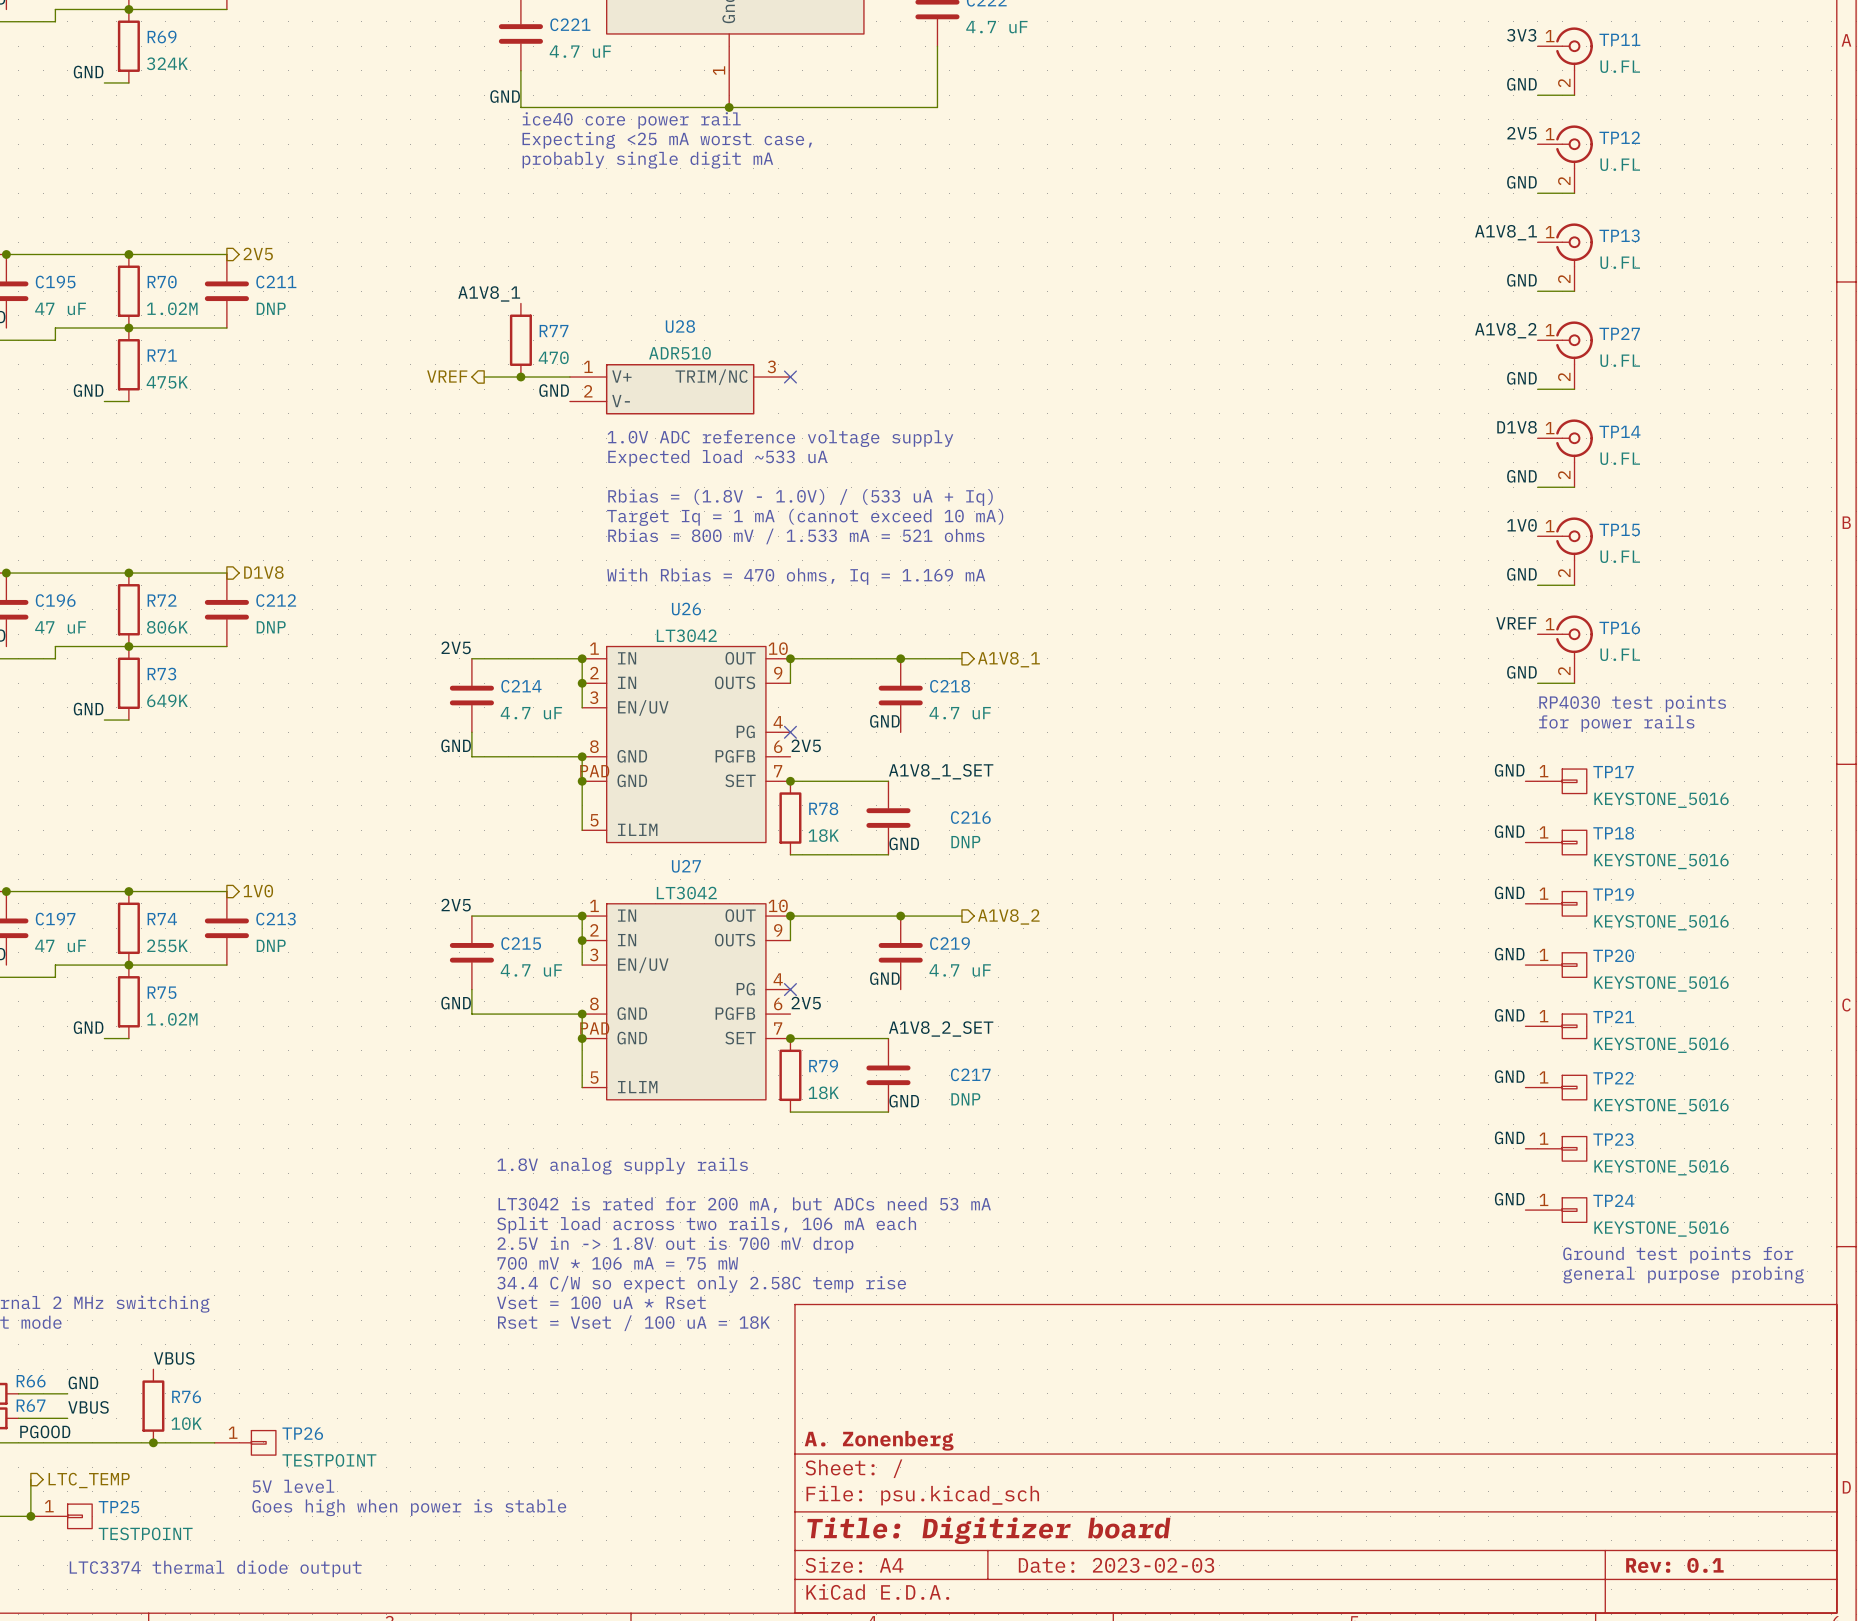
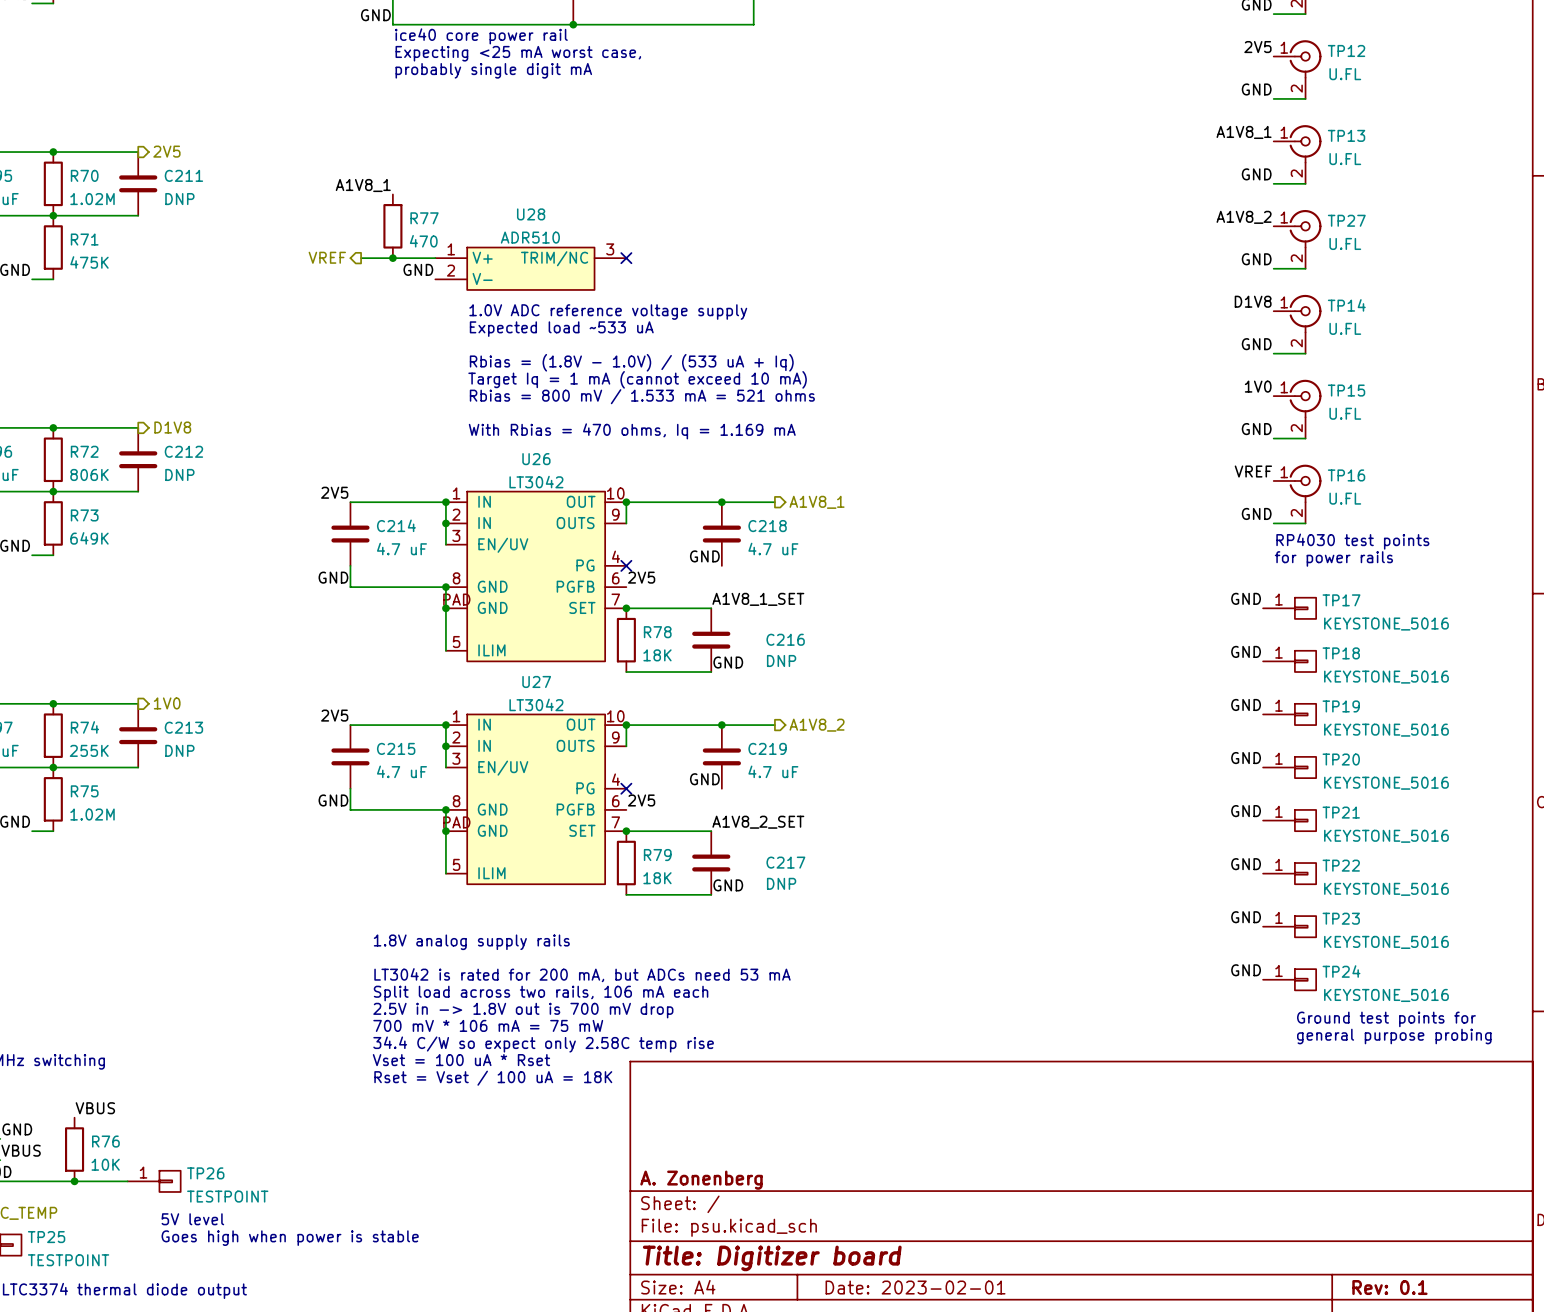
title block: Date: 2023-02-03 (1116, 1565) -> Date: 2023-02-01 (915, 1287)

